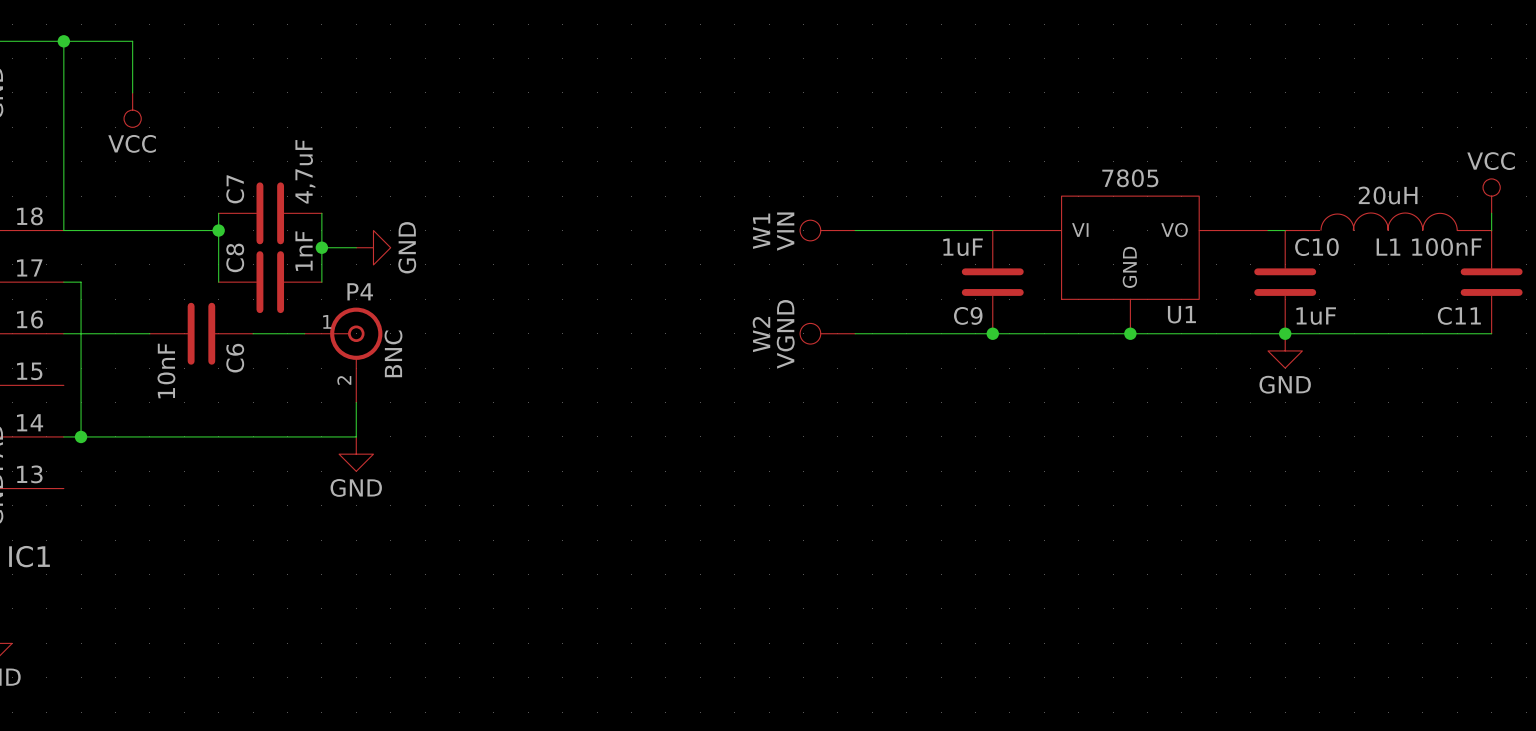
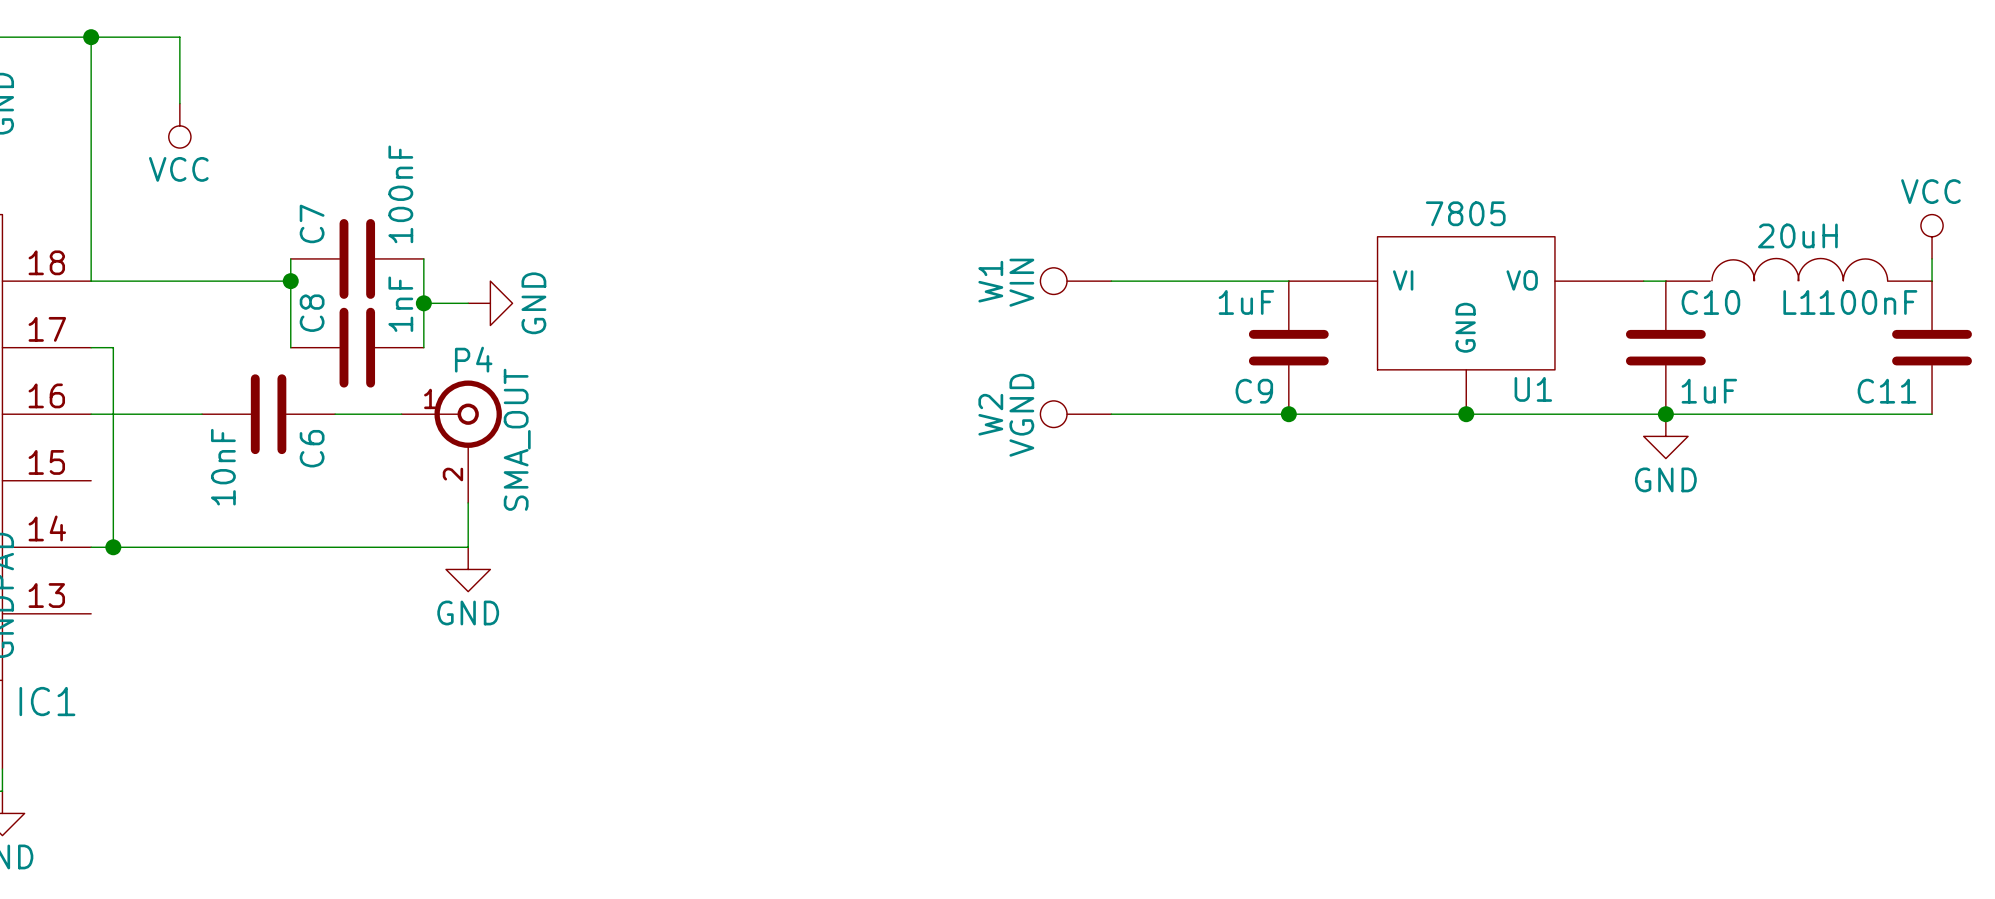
C7 value: 4,7uF (305, 171) -> 100nF (400, 194)
P4 value: BNC (393, 353) -> SMA_OUT (517, 439)

